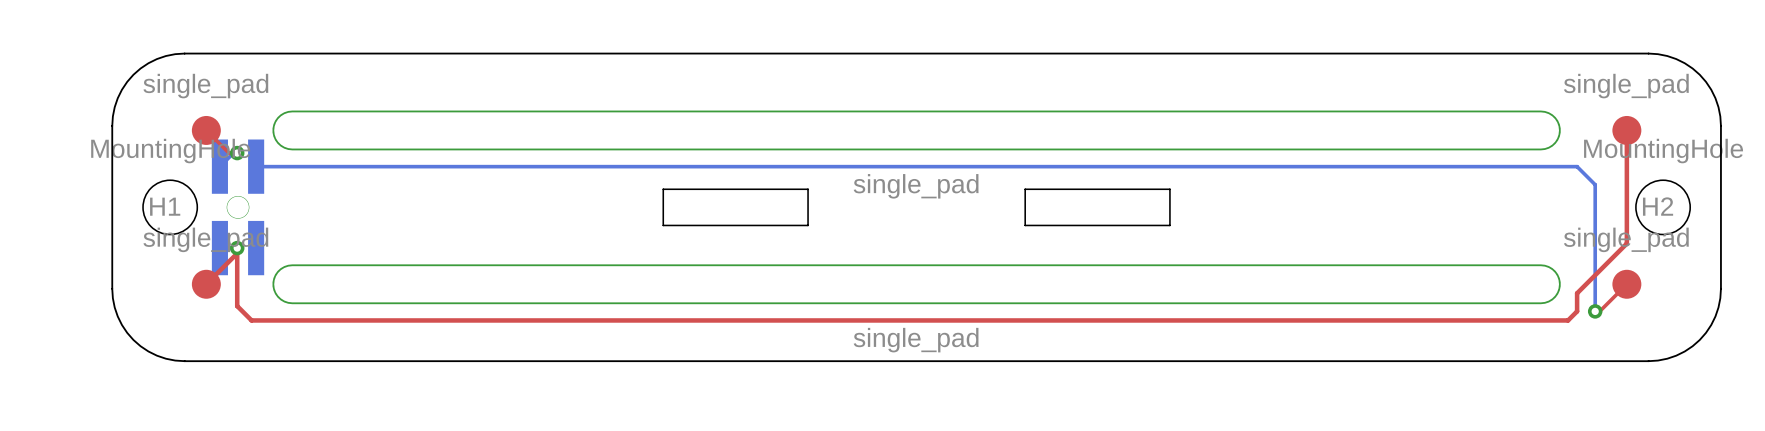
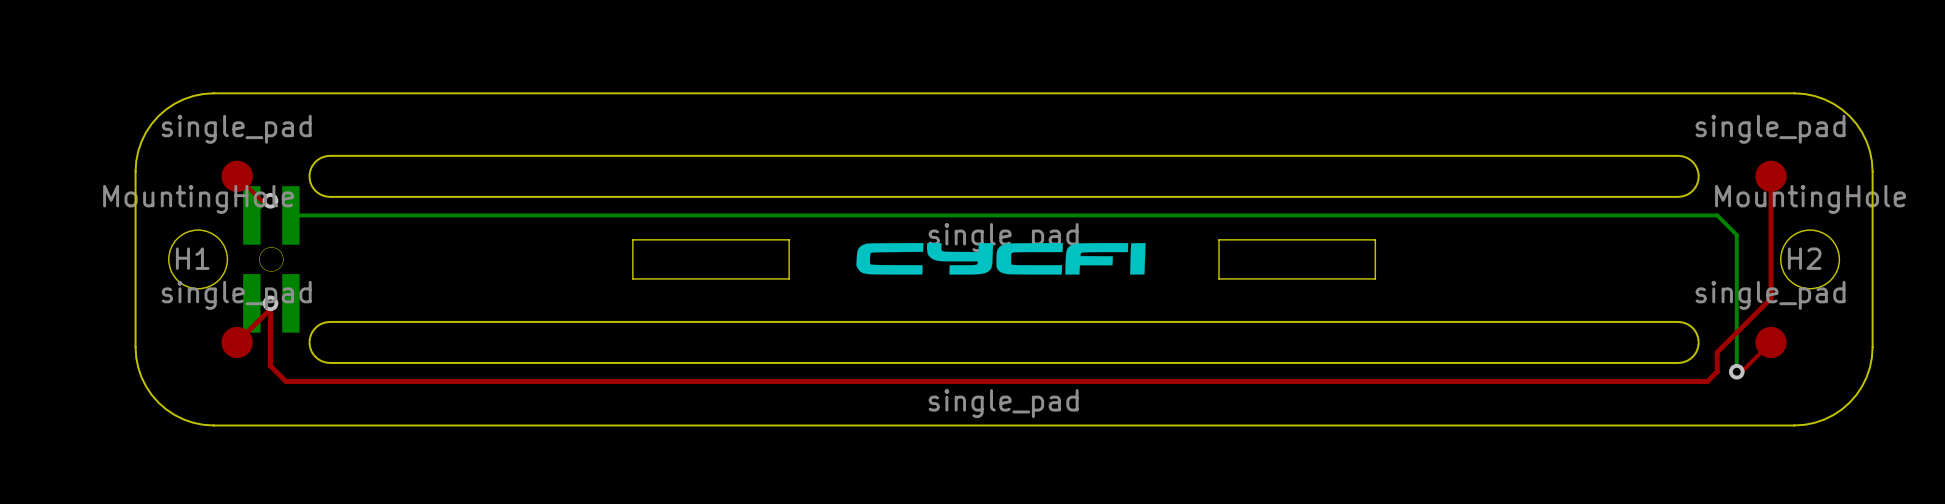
board edge: (663, 189) (663, 225) -> (730, 239) (632, 239) (632, 278) (730, 278)
board edge: (717, 189) (808, 189) (808, 225) (717, 225) -> (789, 239) (789, 278)
board edge: (1115, 189) (1025, 189) (1025, 225) (1115, 225) -> (1219, 239) (1219, 278)
board edge: (1169, 189) (1169, 225) -> (1277, 239) (1375, 239) (1375, 278) (1277, 278)
drawing: none -> [856, 242, 1146, 275]

